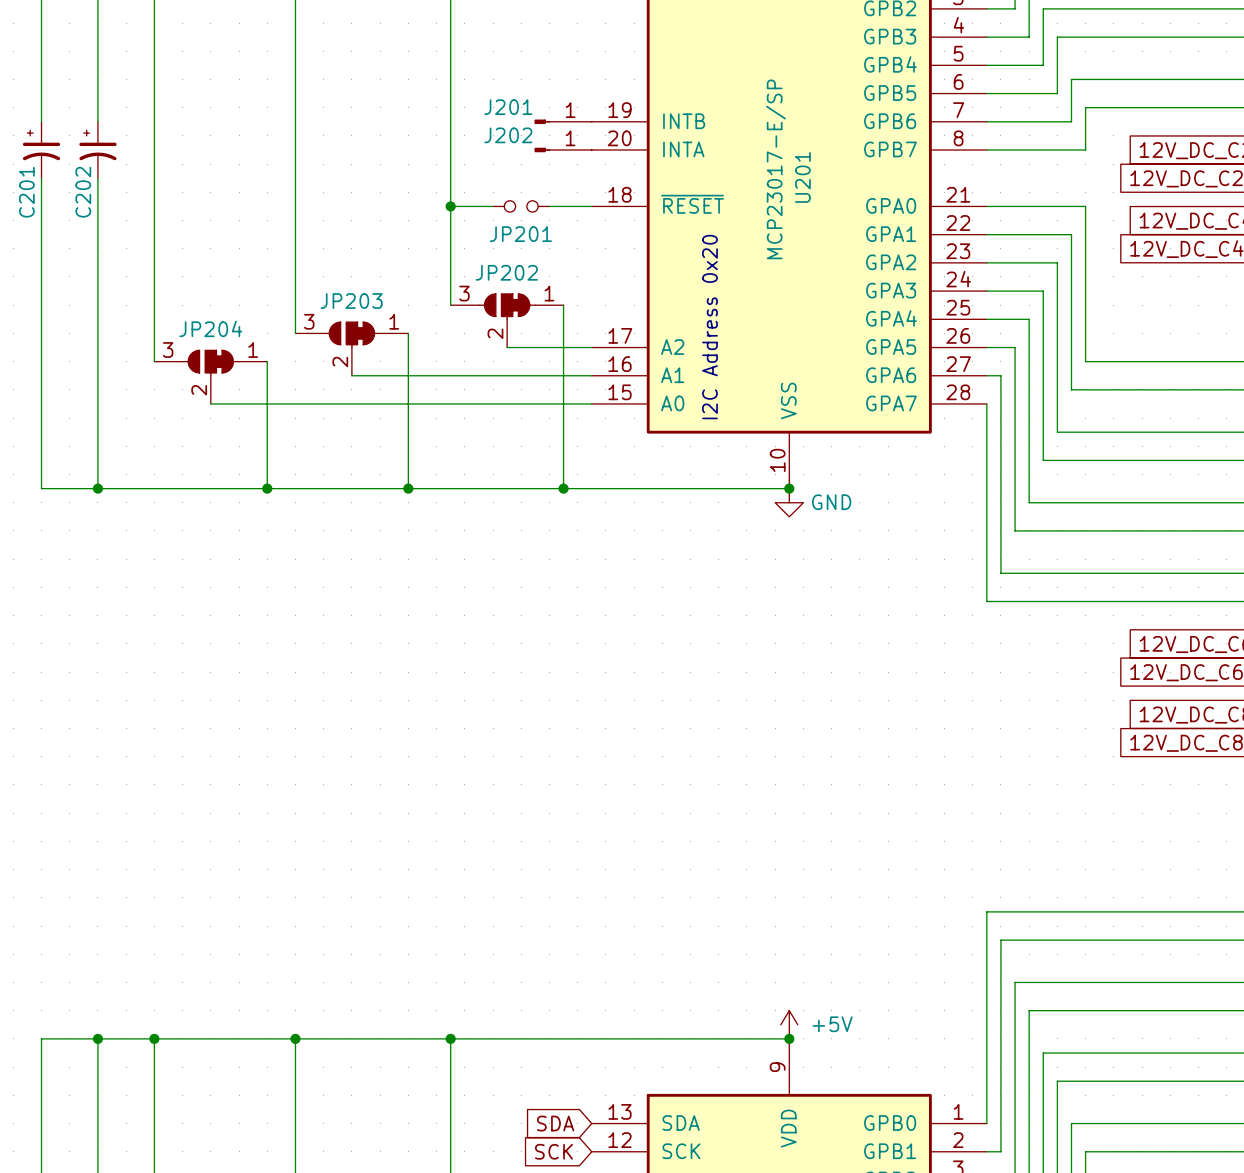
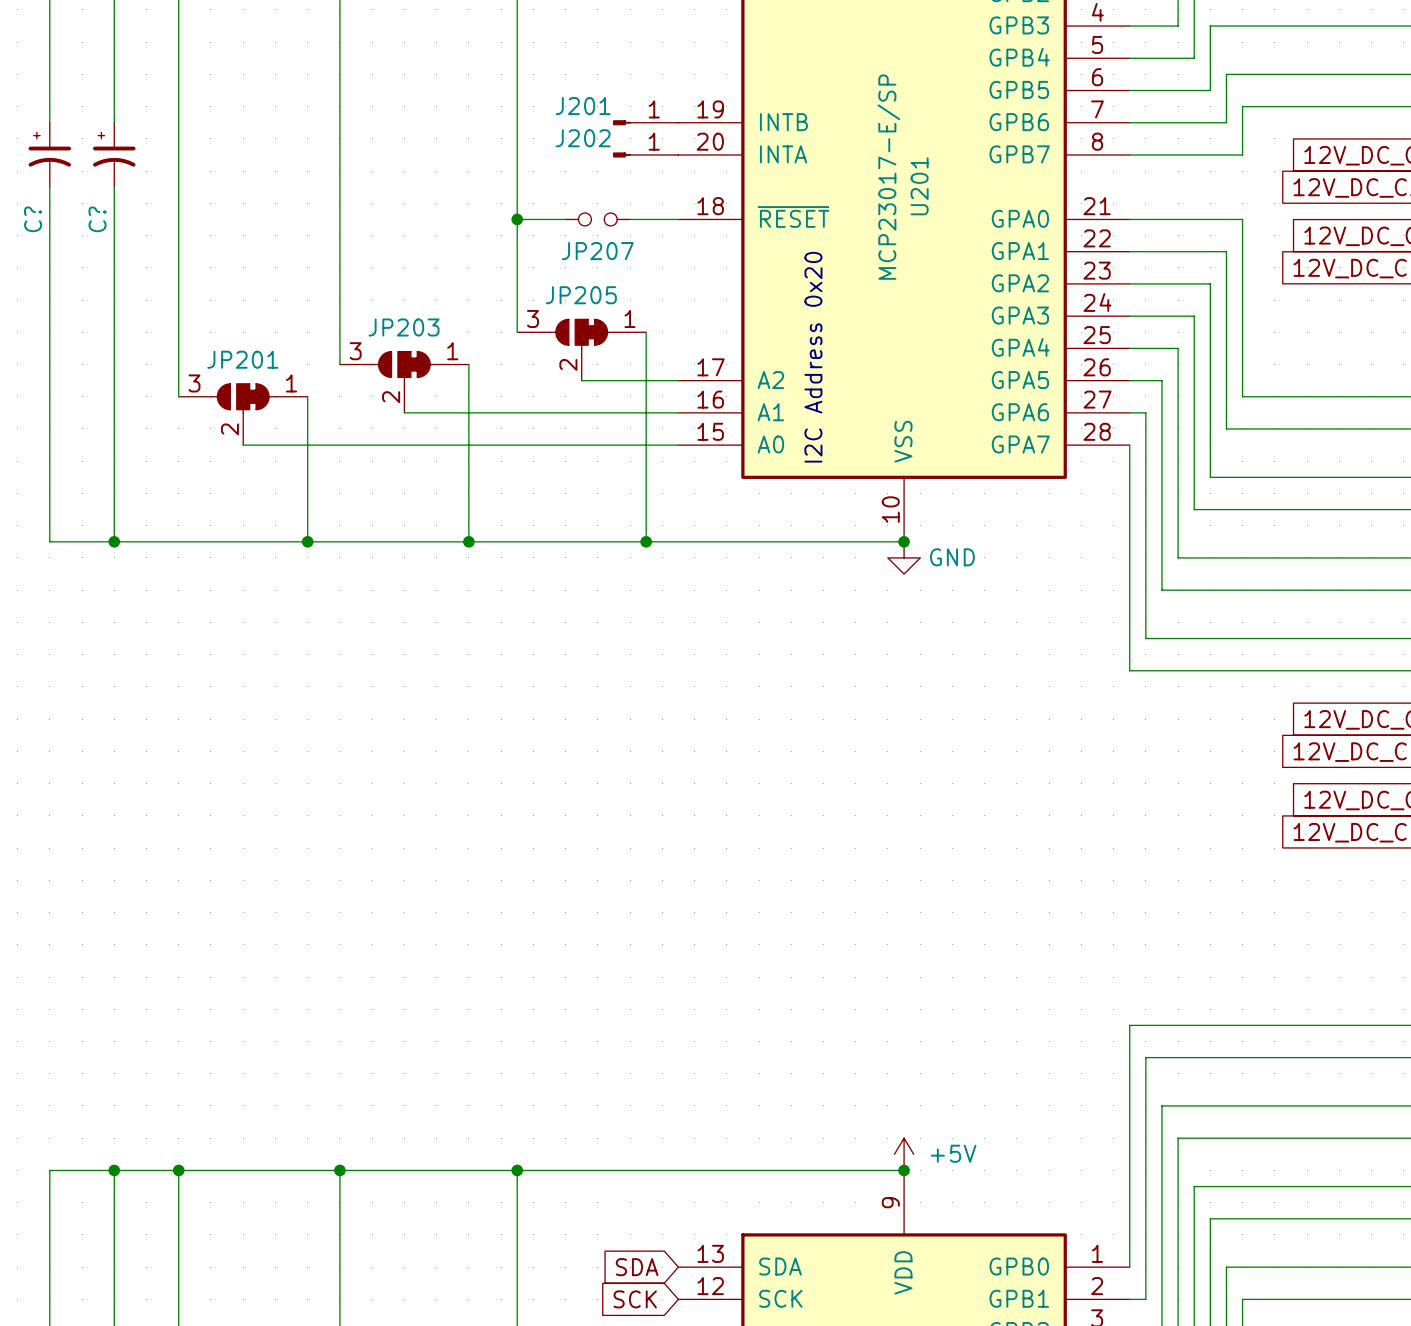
C201 name: C201 (26, 192) -> C? (33, 219)
C202 name: C202 (83, 192) -> C? (97, 219)
JP201 name: JP201 (520, 234) -> JP207 (597, 251)
JP202 name: JP202 (506, 272) -> JP205 (581, 295)
JP204 name: JP204 (210, 328) -> JP201 (242, 359)

